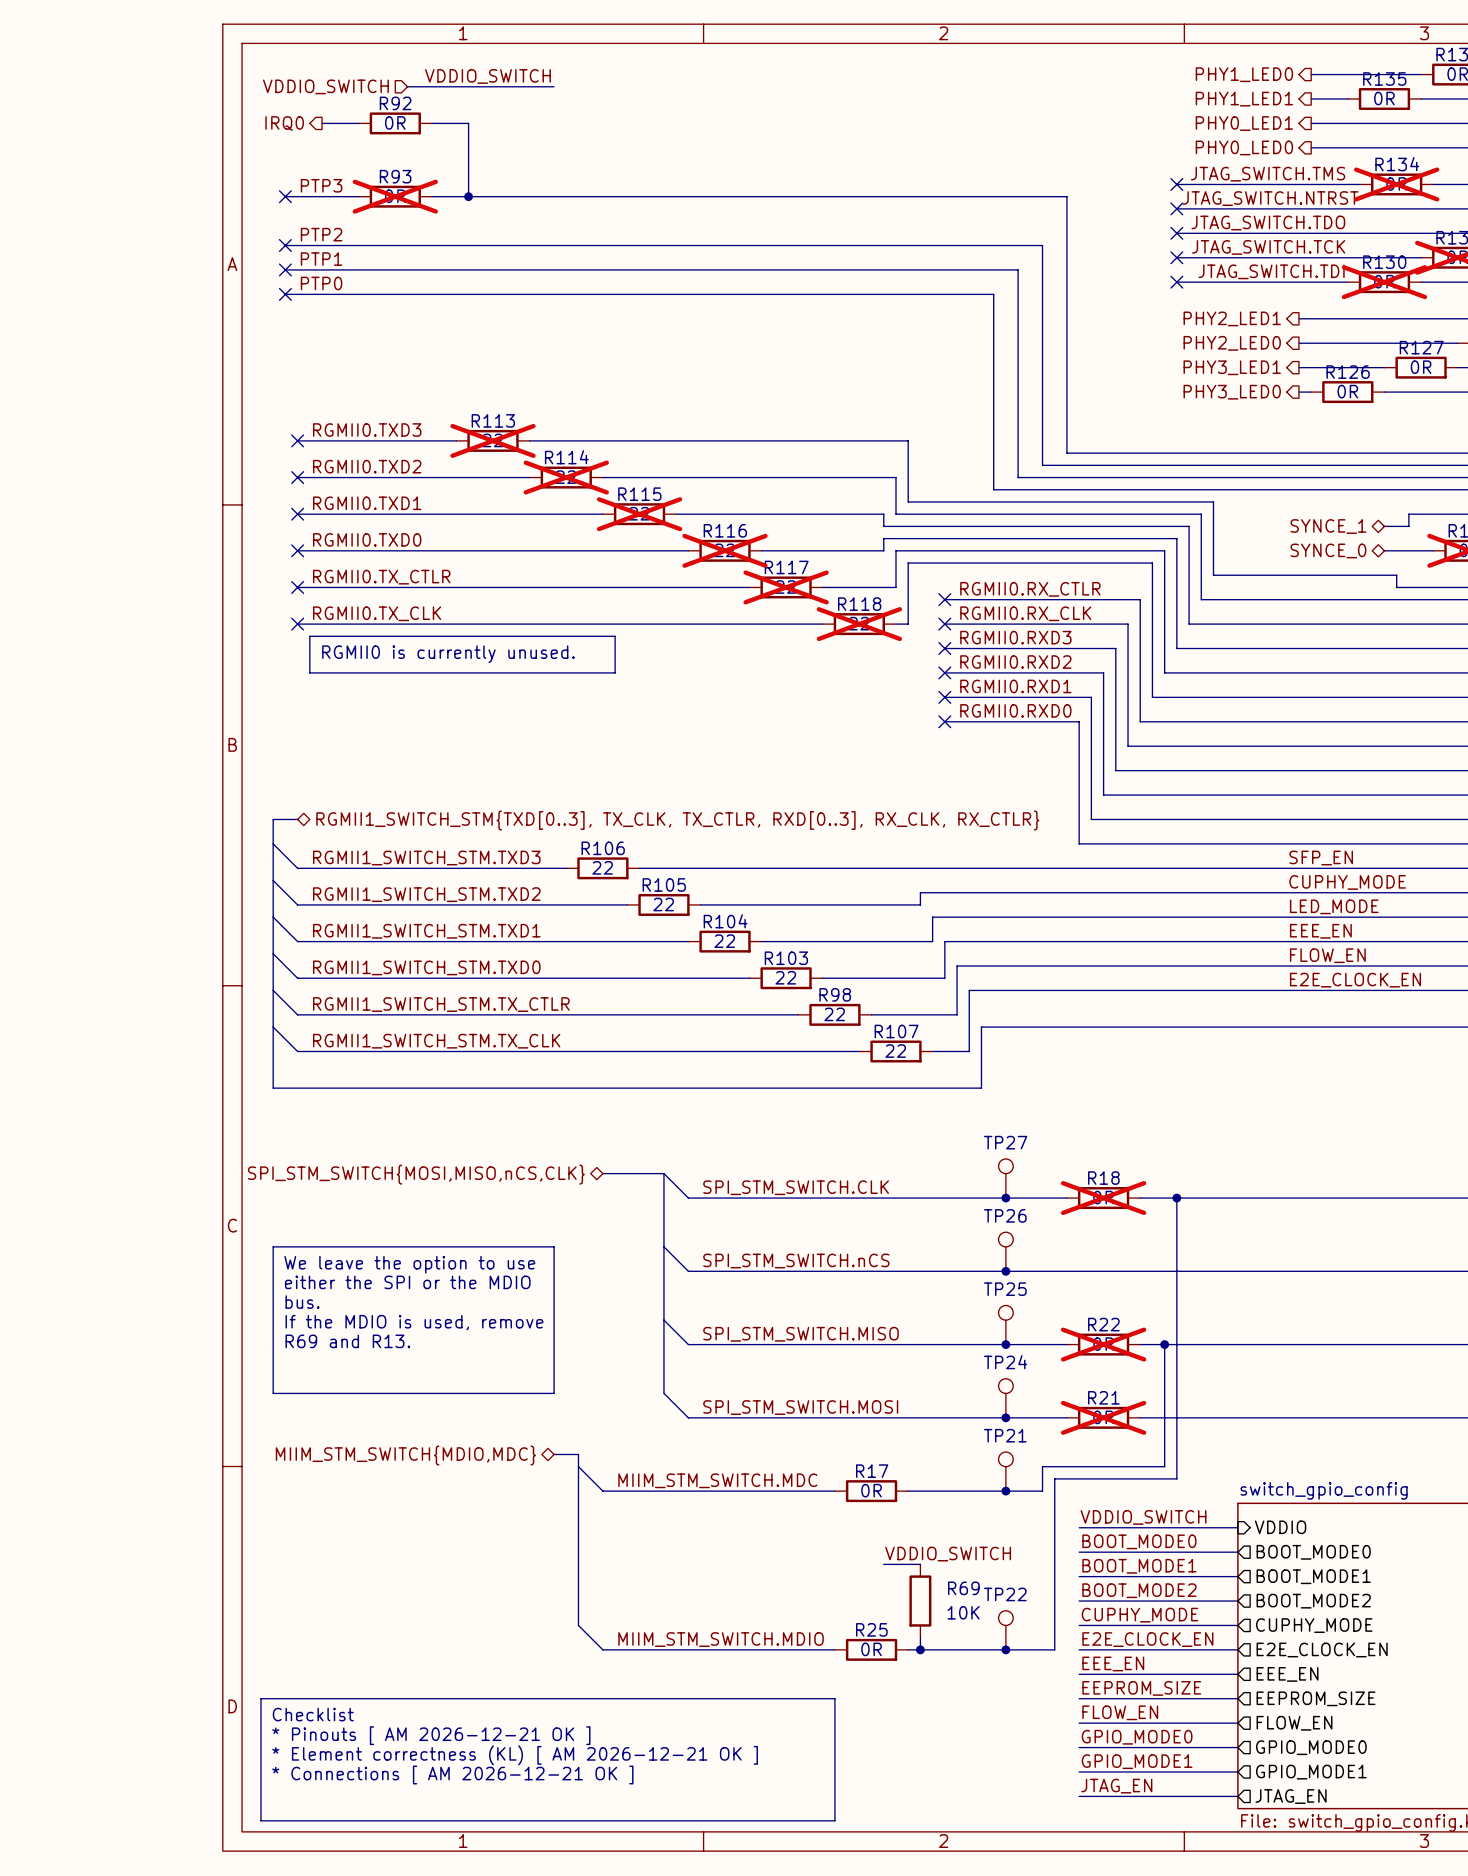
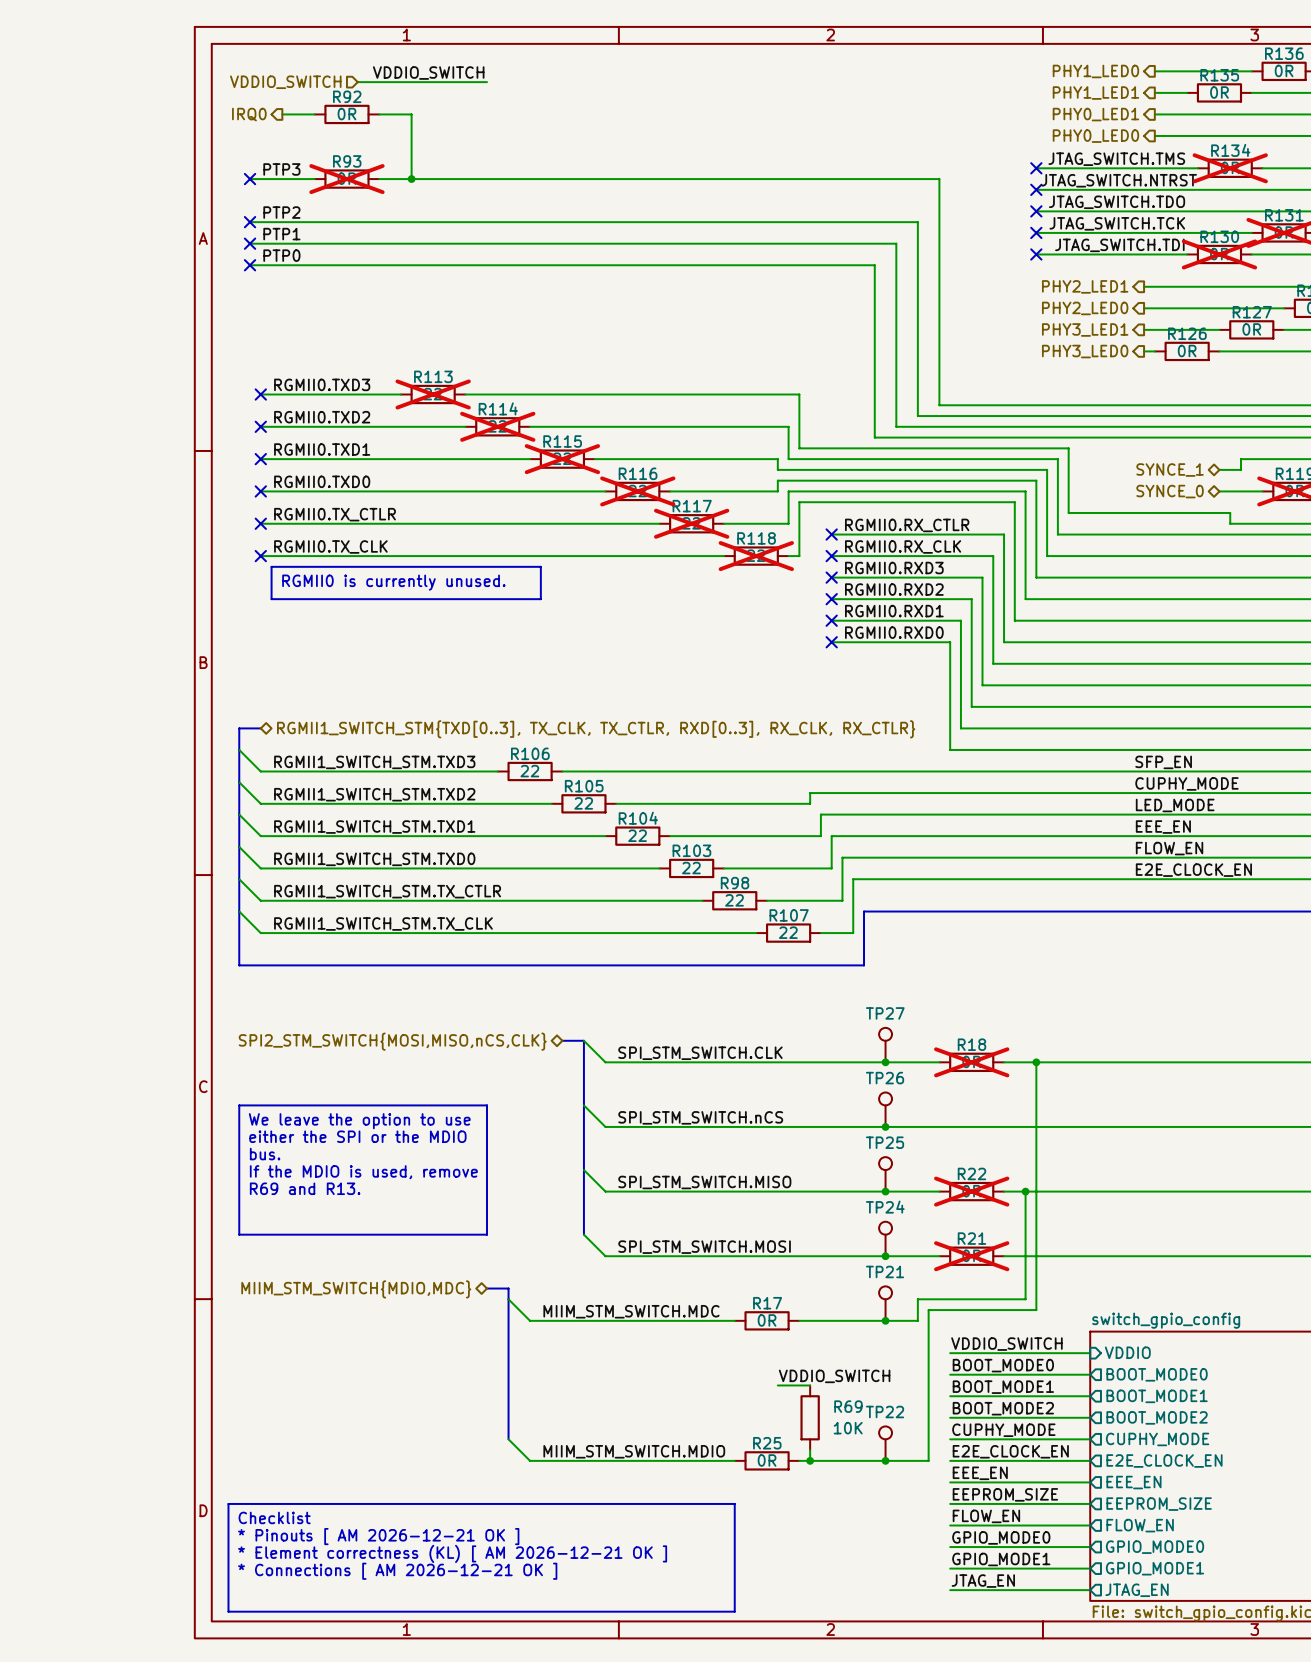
bus: (602, 1173) (639, 1173) -> none
hierarchical label: SPI_STM_SWITCH{MOSI,MISO,nCS,CLK} (416, 1174) -> SPI2_STM_SWITCH{MOSI,MISO,nCS,CLK} (392, 1041)

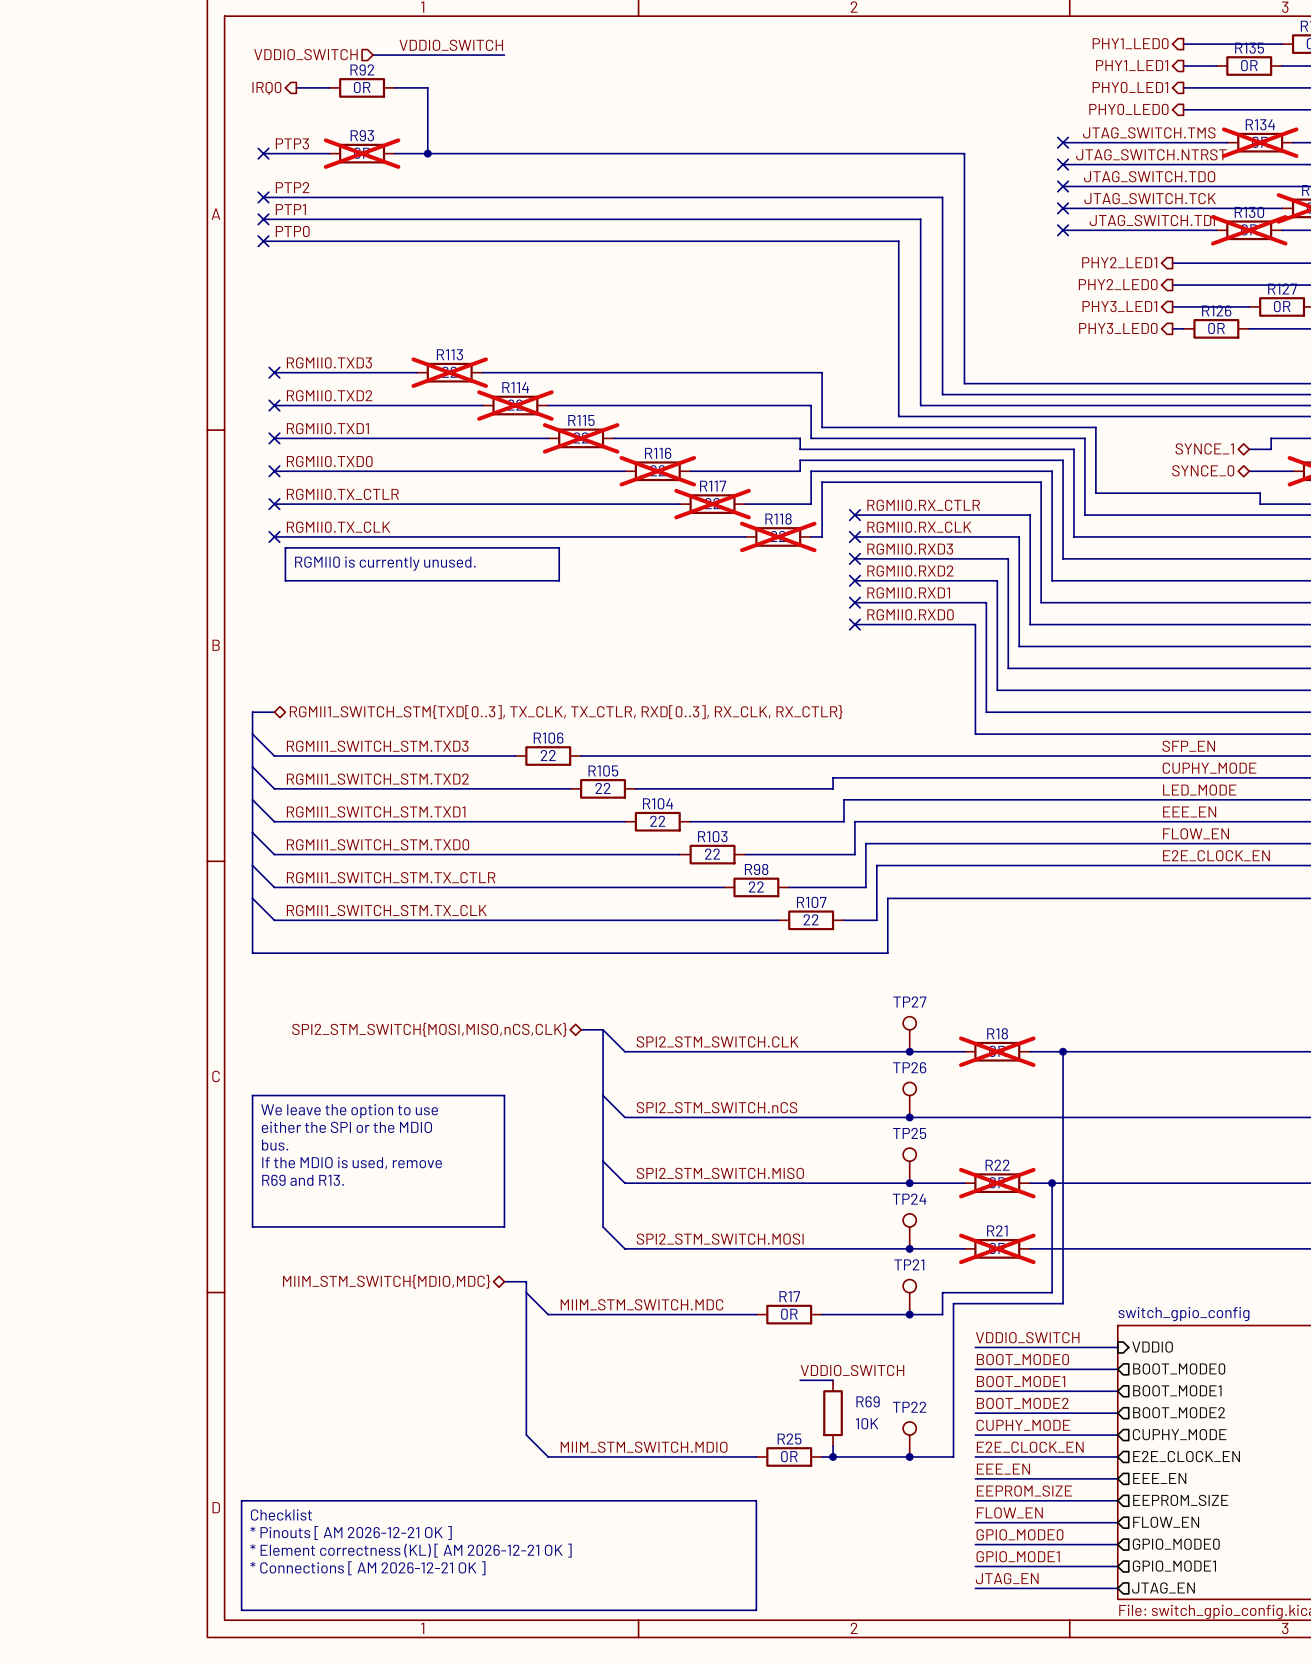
label: SPI_STM_SWITCH.CLK (700, 1053) -> SPI2_STM_SWITCH.CLK (717, 1041)
label: SPI_STM_SWITCH.nCS (700, 1117) -> SPI2_STM_SWITCH.nCS (716, 1107)
label: SPI_STM_SWITCH.MISO (704, 1182) -> SPI2_STM_SWITCH.MISO (720, 1173)
label: SPI_STM_SWITCH.MOSI (704, 1247) -> SPI2_STM_SWITCH.MOSI (720, 1239)

